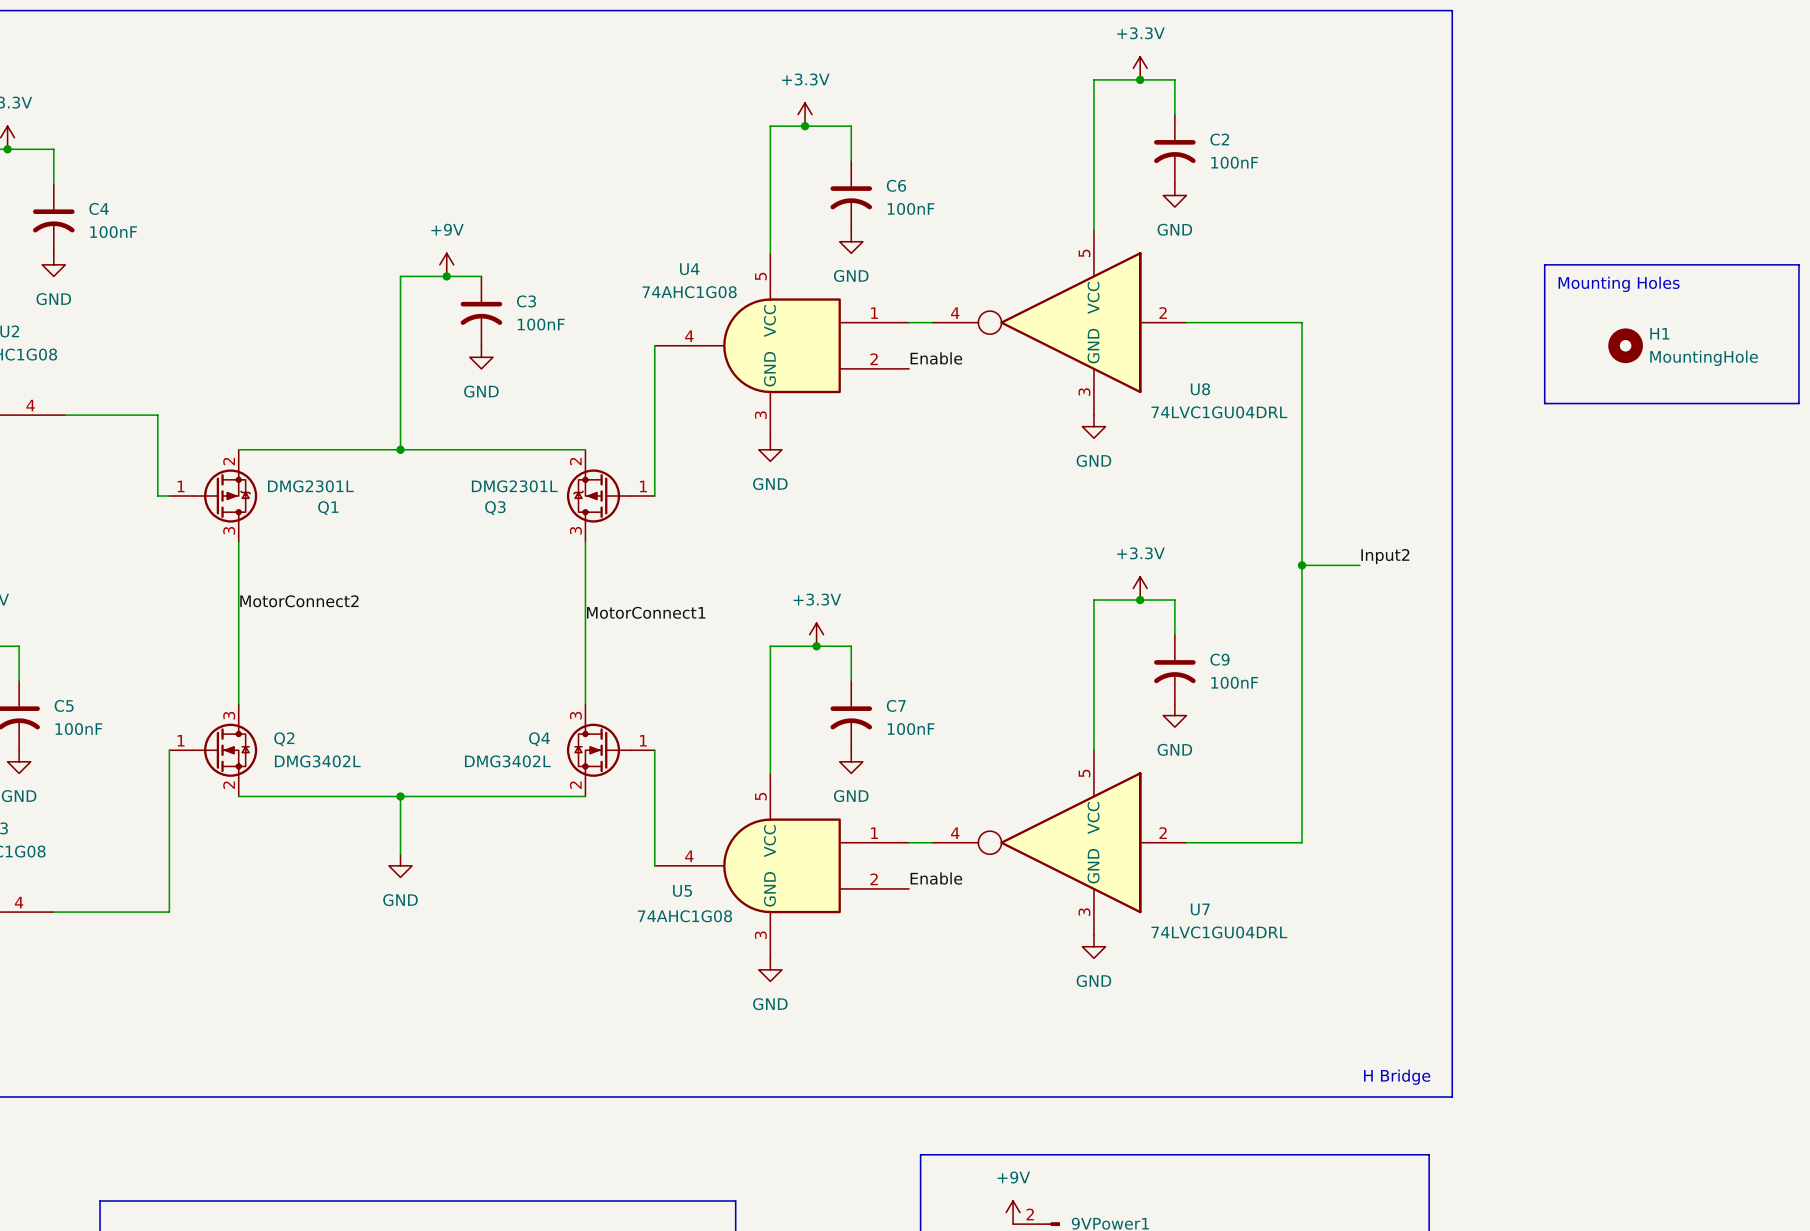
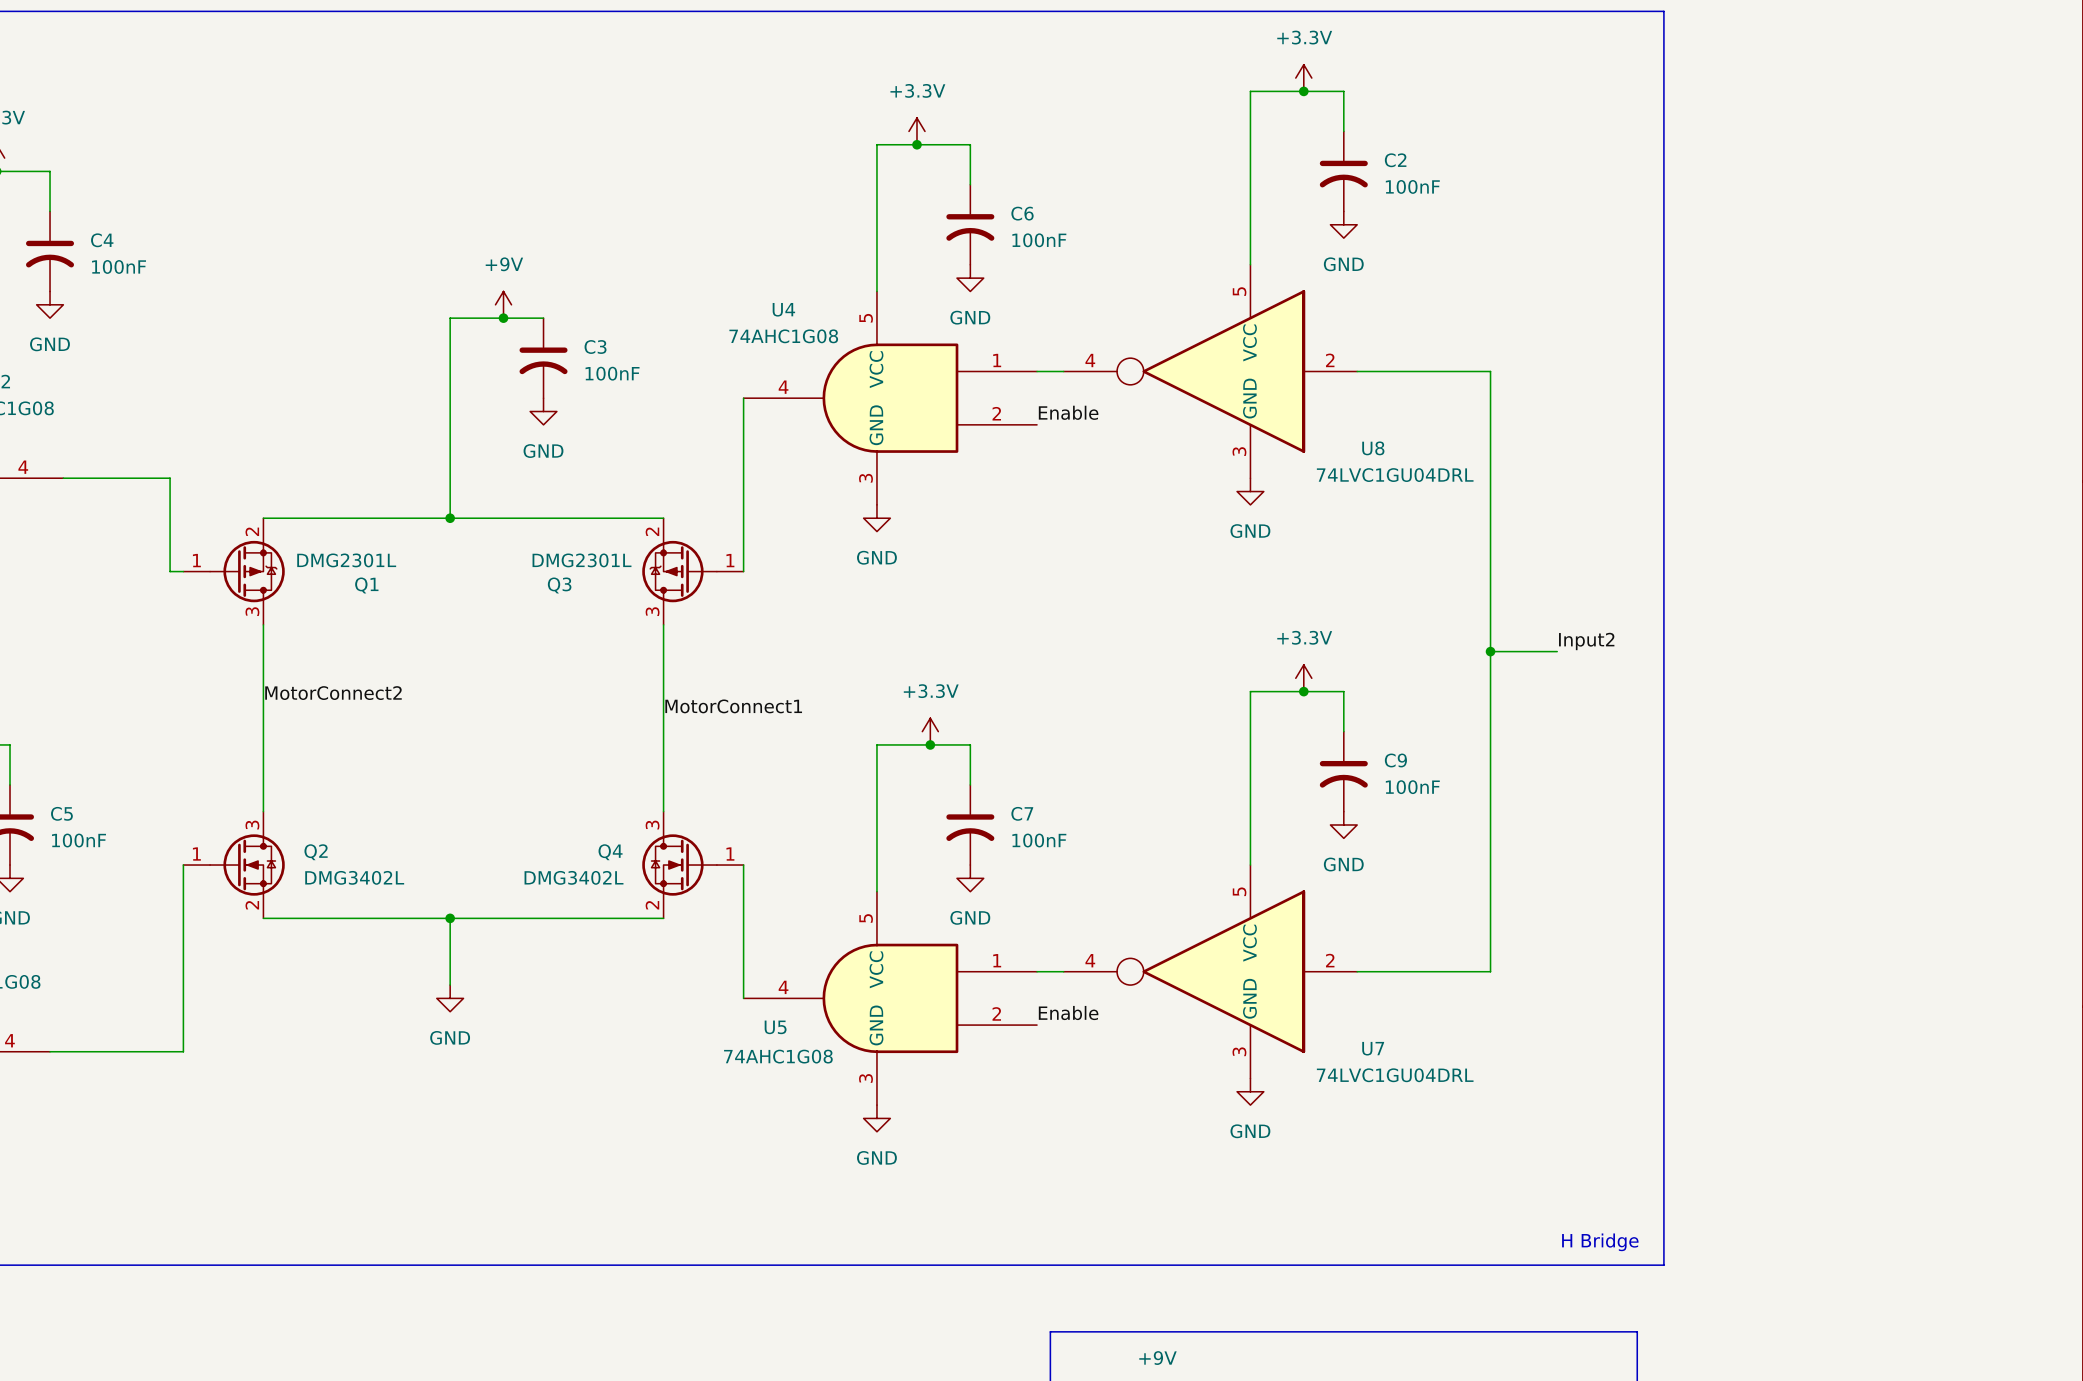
line: (1544, 264) (1798, 264) (1798, 403) (1544, 403) (1544, 264) -> none
text: Mounting Holes (1619, 284) -> none
H1: MountingHole (1625, 345) -> none

